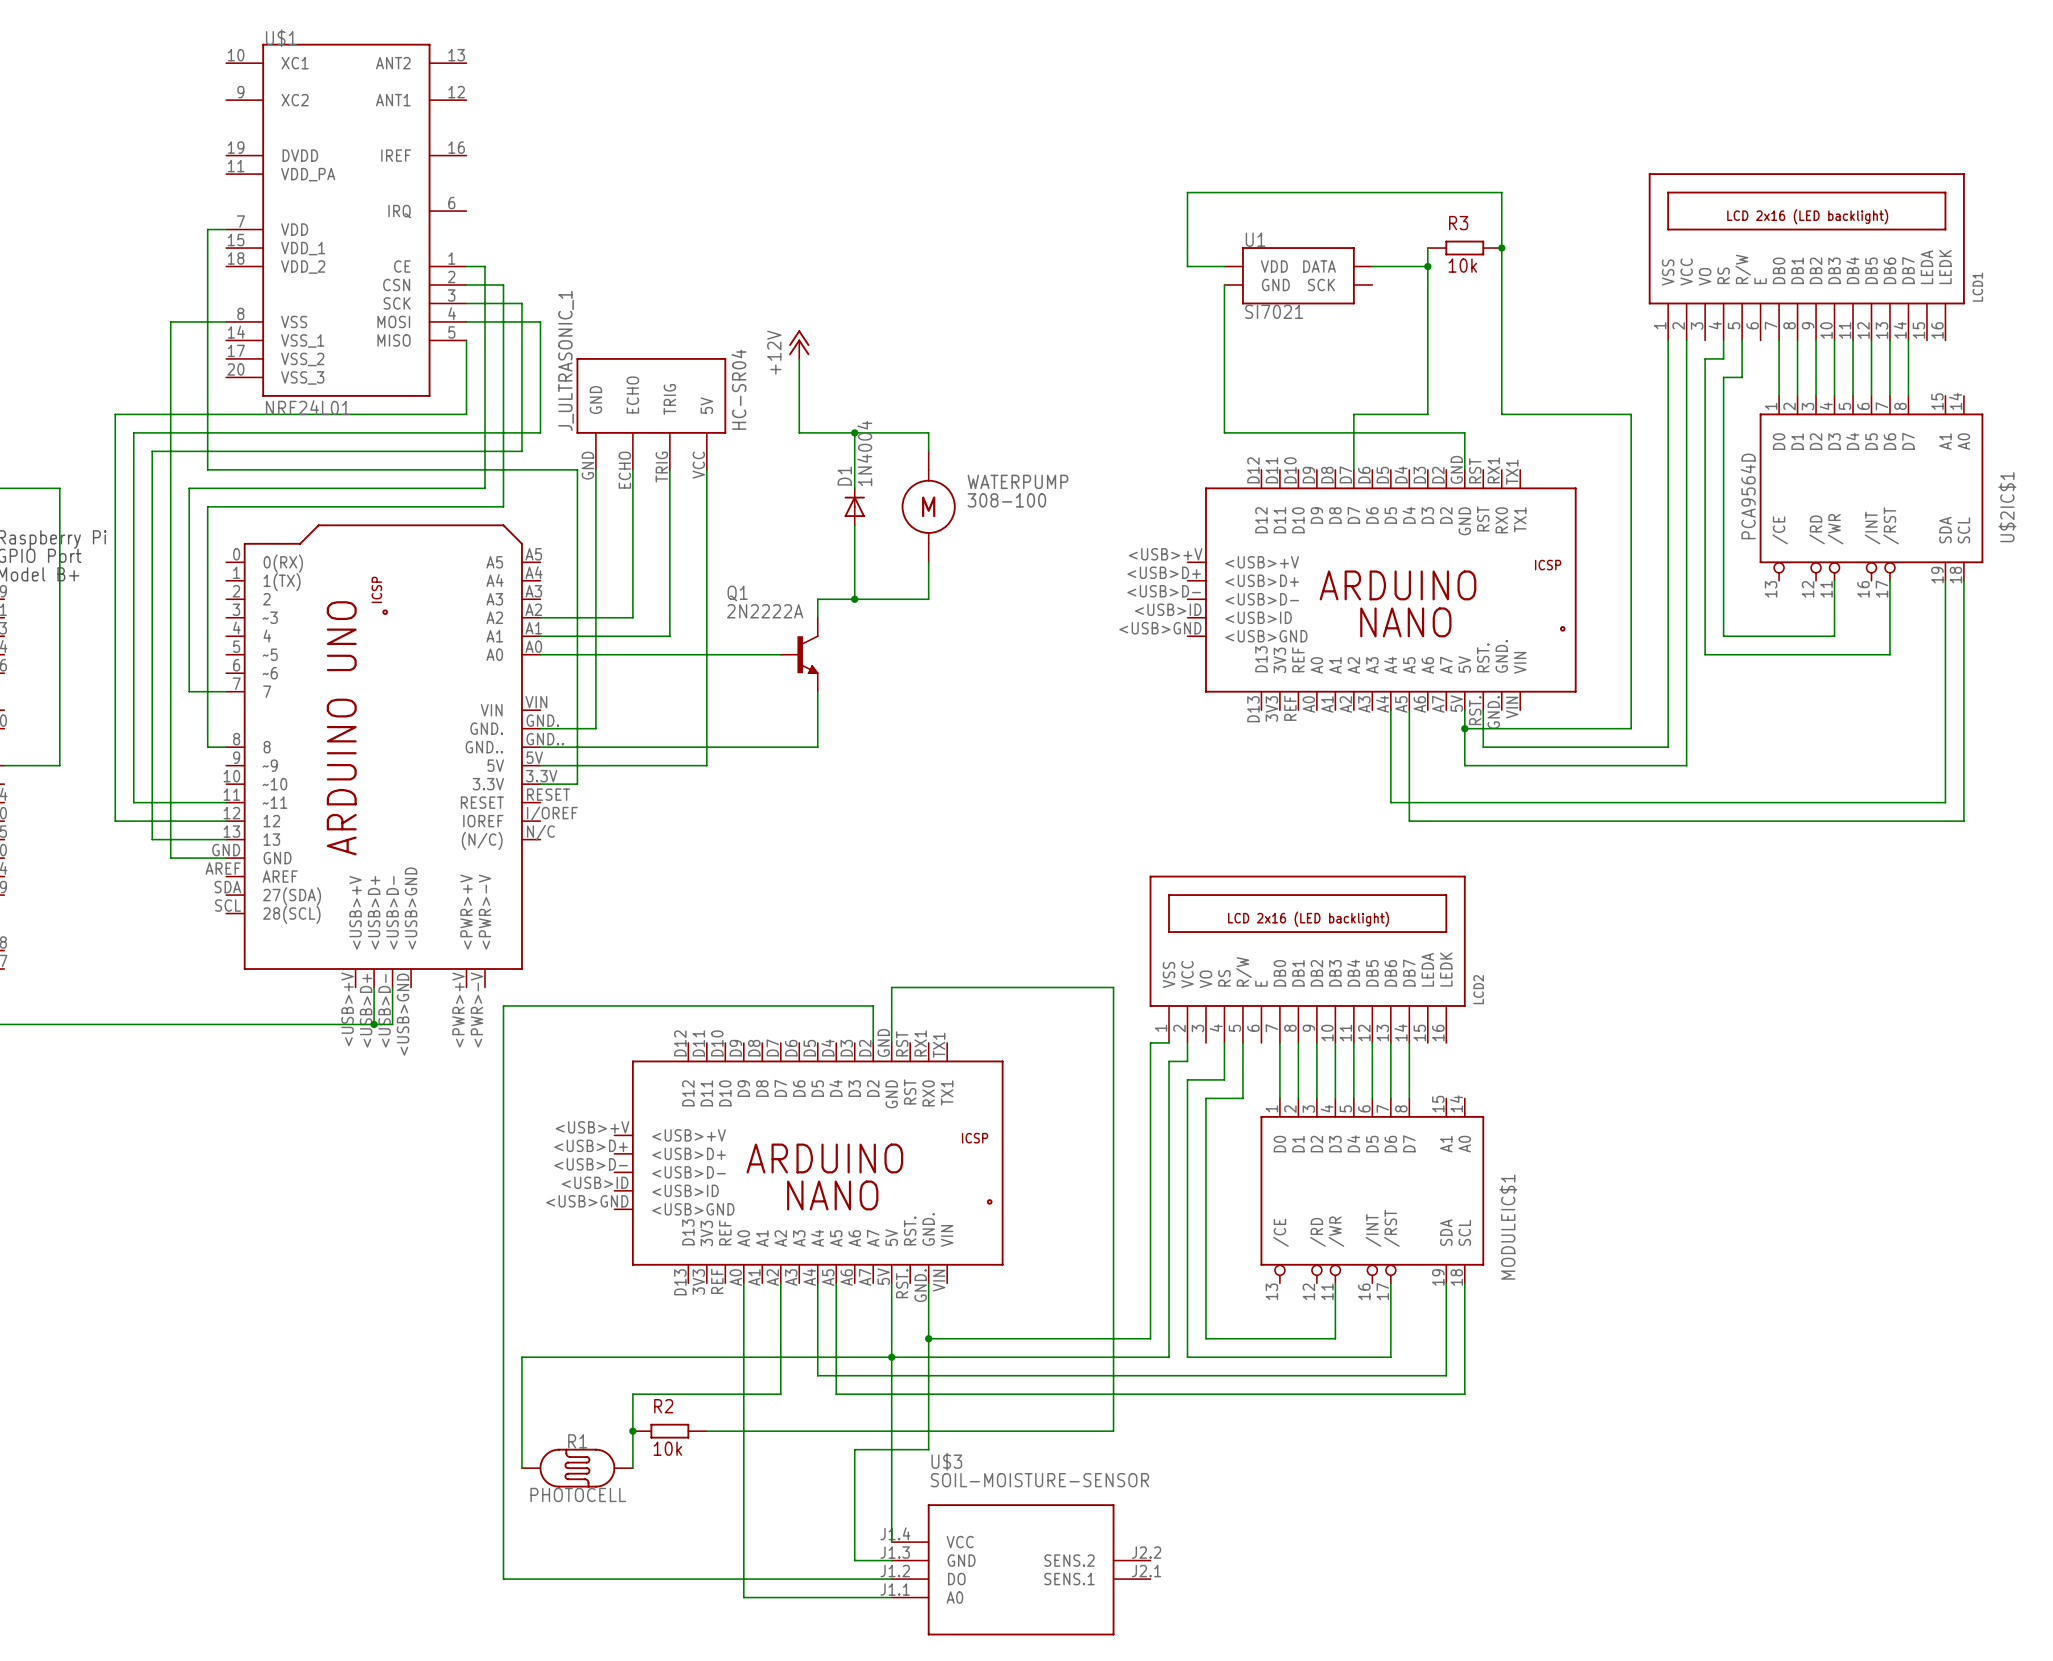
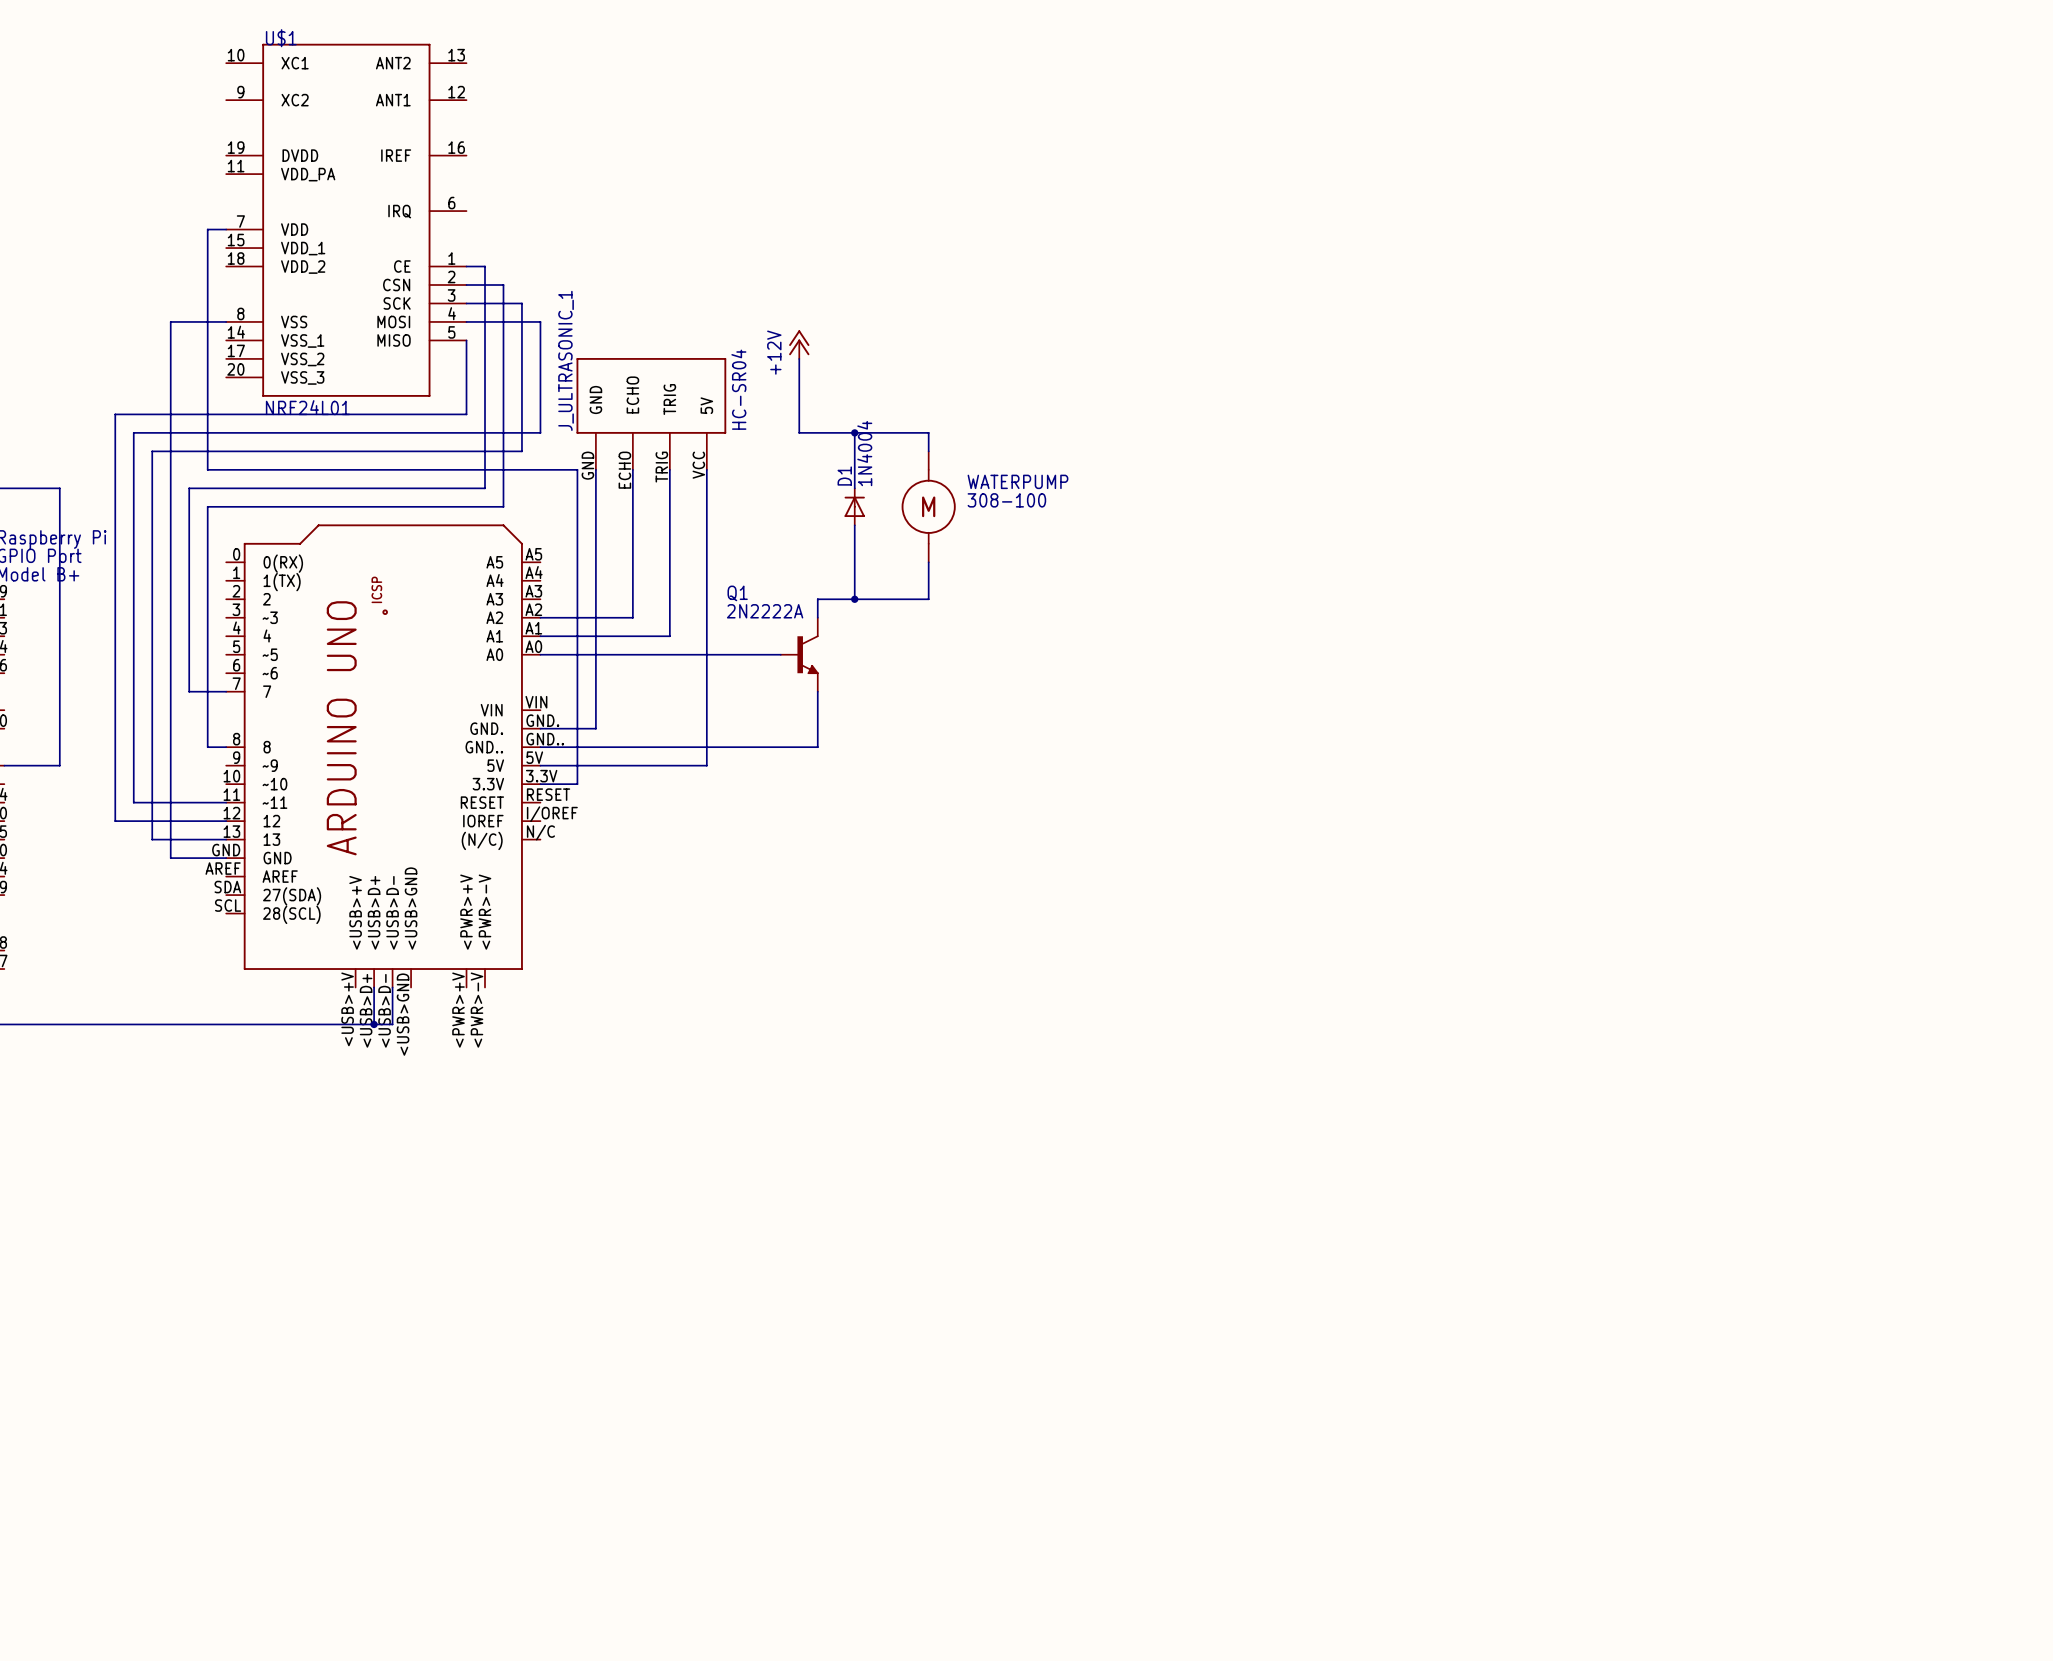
wire: (1427, 248) (1427, 414) (1353, 414) (1353, 469) -> none
R3: 10k (1464, 248) -> none
junction: (1501, 248) -> none
LCD1: (1806, 256) -> none
wire: (1224, 266) (1187, 266) (1187, 192) (1501, 192) (1501, 414) (1631, 414) (1631, 728) (1464, 728) -> none
wire: (1372, 266) (1427, 266) -> none
junction: (1427, 266) -> none
U1: SI7021 (1298, 275) -> none
wire: (1224, 285) (1224, 432) (1464, 432) (1464, 469) -> none
wire: (1668, 340) (1668, 747) (1483, 747) (1483, 710) -> none
wire: (1686, 340) (1686, 765) (1464, 765) (1464, 710) -> none
wire: (1723, 340) (1723, 358) (1705, 358) (1705, 654) (1889, 654) (1889, 580) -> none
wire: (1742, 340) (1742, 377) (1723, 377) (1723, 636) (1834, 636) (1834, 580) -> none
wire: (1779, 340) (1779, 395) -> none
wire: (1797, 340) (1797, 395) -> none
wire: (1816, 340) (1816, 395) -> none
wire: (1834, 340) (1834, 395) -> none
wire: (1853, 340) (1853, 395) -> none
wire: (1871, 340) (1871, 395) -> none
wire: (1889, 340) (1889, 395) -> none
wire: (1908, 340) (1908, 395) -> none
U$2IC$1: PCA9564D (1871, 488) -> none
wire: (1945, 580) (1945, 802) (1390, 802) (1390, 710) -> none
wire: (1963, 580) (1963, 821) (1409, 821) (1409, 710) -> none
part: (1382, 590) -> none
junction: (1464, 728) -> none
LCD2: (1307, 959) -> none
wire: (873, 1042) (873, 1005) (503, 1005) (503, 1579) (891, 1579) -> none
wire: (891, 1042) (891, 987) (1113, 987) (1113, 1431) (706, 1431) -> none
wire: (1169, 1042) (1150, 1042) (1150, 1338) (928, 1338) -> none
wire: (1187, 1042) (1187, 1061) (1169, 1061) (1169, 1357) (521, 1357) (521, 1468) -> none
wire: (1224, 1042) (1224, 1079) (1187, 1079) (1187, 1357) (1390, 1357) (1390, 1283) -> none
wire: (1242, 1042) (1242, 1098) (1205, 1098) (1205, 1338) (1335, 1338) (1335, 1283) -> none
wire: (1279, 1042) (1279, 1098) -> none
wire: (1298, 1042) (1298, 1098) -> none
wire: (1316, 1042) (1316, 1098) -> none
wire: (1335, 1042) (1335, 1098) -> none
wire: (1353, 1042) (1353, 1098) -> none
wire: (1372, 1042) (1372, 1098) -> none
wire: (1390, 1042) (1390, 1098) -> none
wire: (1409, 1042) (1409, 1098) -> none
part: (808, 1163) -> none
MODULEIC$1: (1372, 1190) -> none
wire: (743, 1283) (743, 1597) (891, 1597) -> none
wire: (780, 1283) (780, 1394) (632, 1394) (632, 1468) -> none
wire: (817, 1283) (817, 1375) (1446, 1375) (1446, 1283) -> none
wire: (836, 1283) (836, 1394) (1464, 1394) (1464, 1283) -> none
wire: (891, 1283) (891, 1542) -> none
wire: (928, 1283) (928, 1449) (854, 1449) (854, 1560) (891, 1560) -> none
junction: (928, 1338) -> none
junction: (891, 1357) -> none
junction: (632, 1431) -> none
R2: 10k (669, 1431) -> none
R1: PHOTOCELL (577, 1468) -> none
U$3: SOIL-MOISTURE-SENSOR (1021, 1569) -> none

